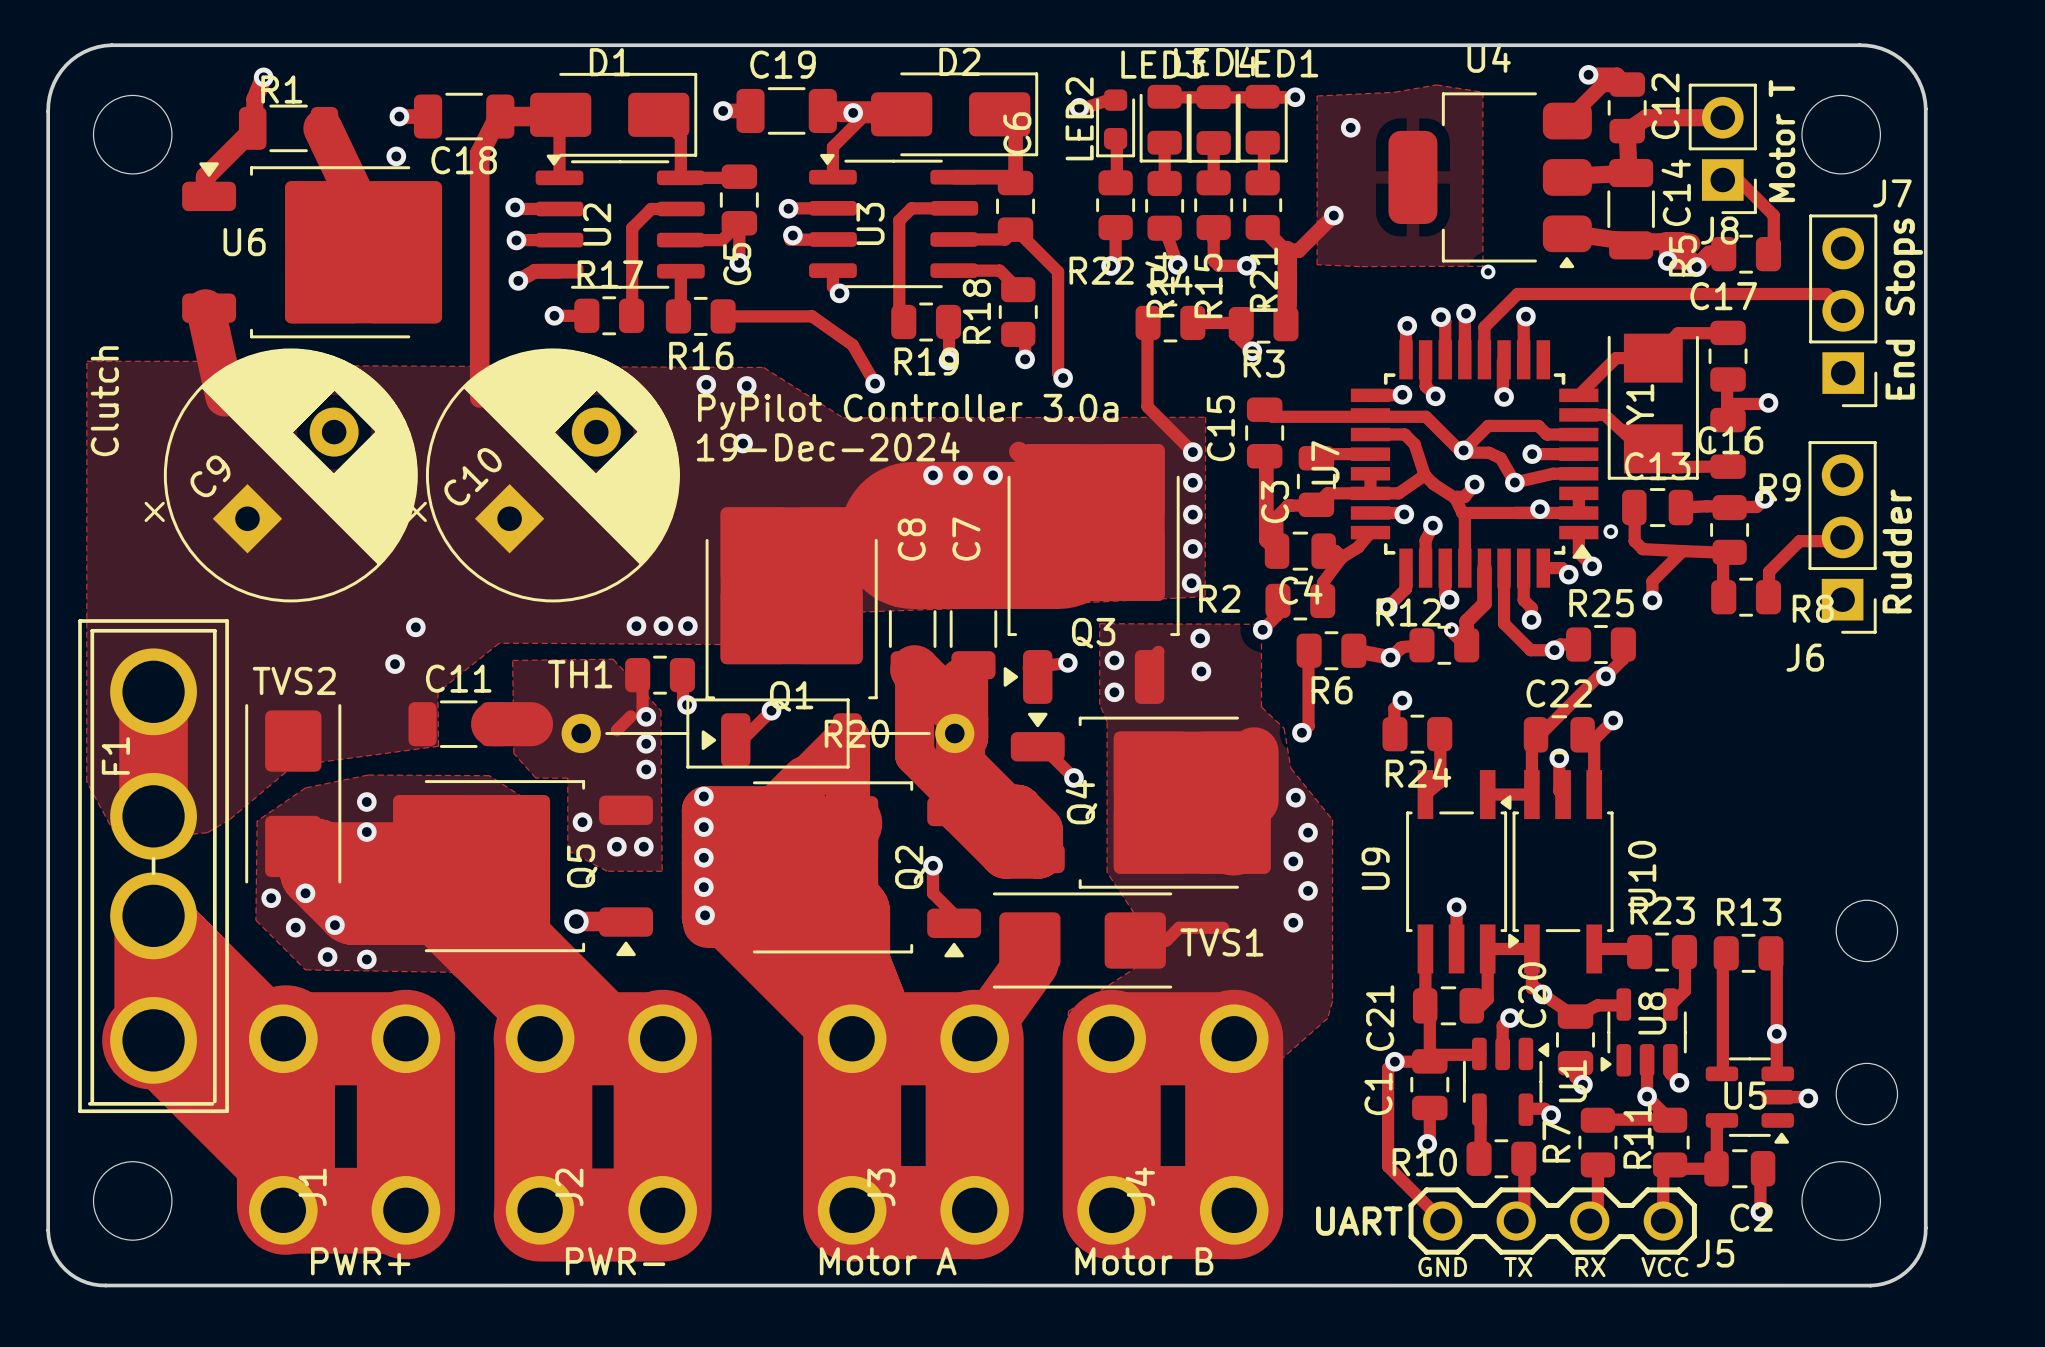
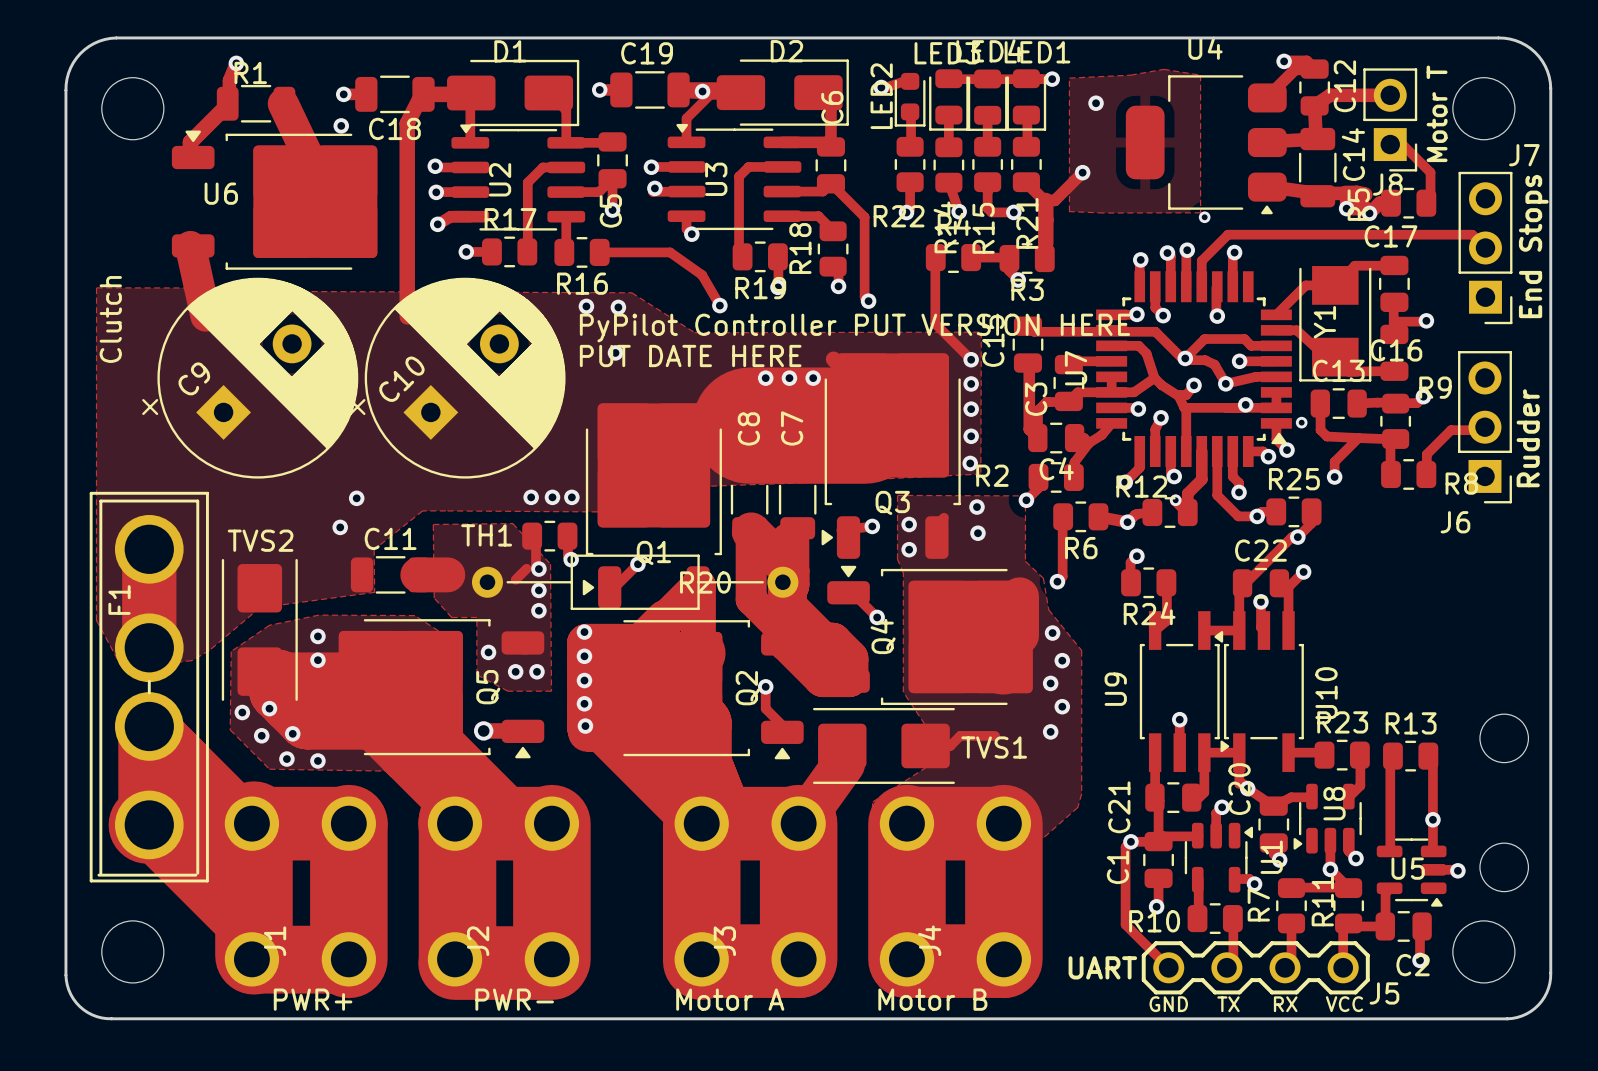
text: PyPilot Controller 3.0a (908, 412) -> PyPilot Controller PUT VERSION HERE (854, 328)
text: 19-Dec-2024 (828, 446) -> PUT DATE HERE (690, 356)

